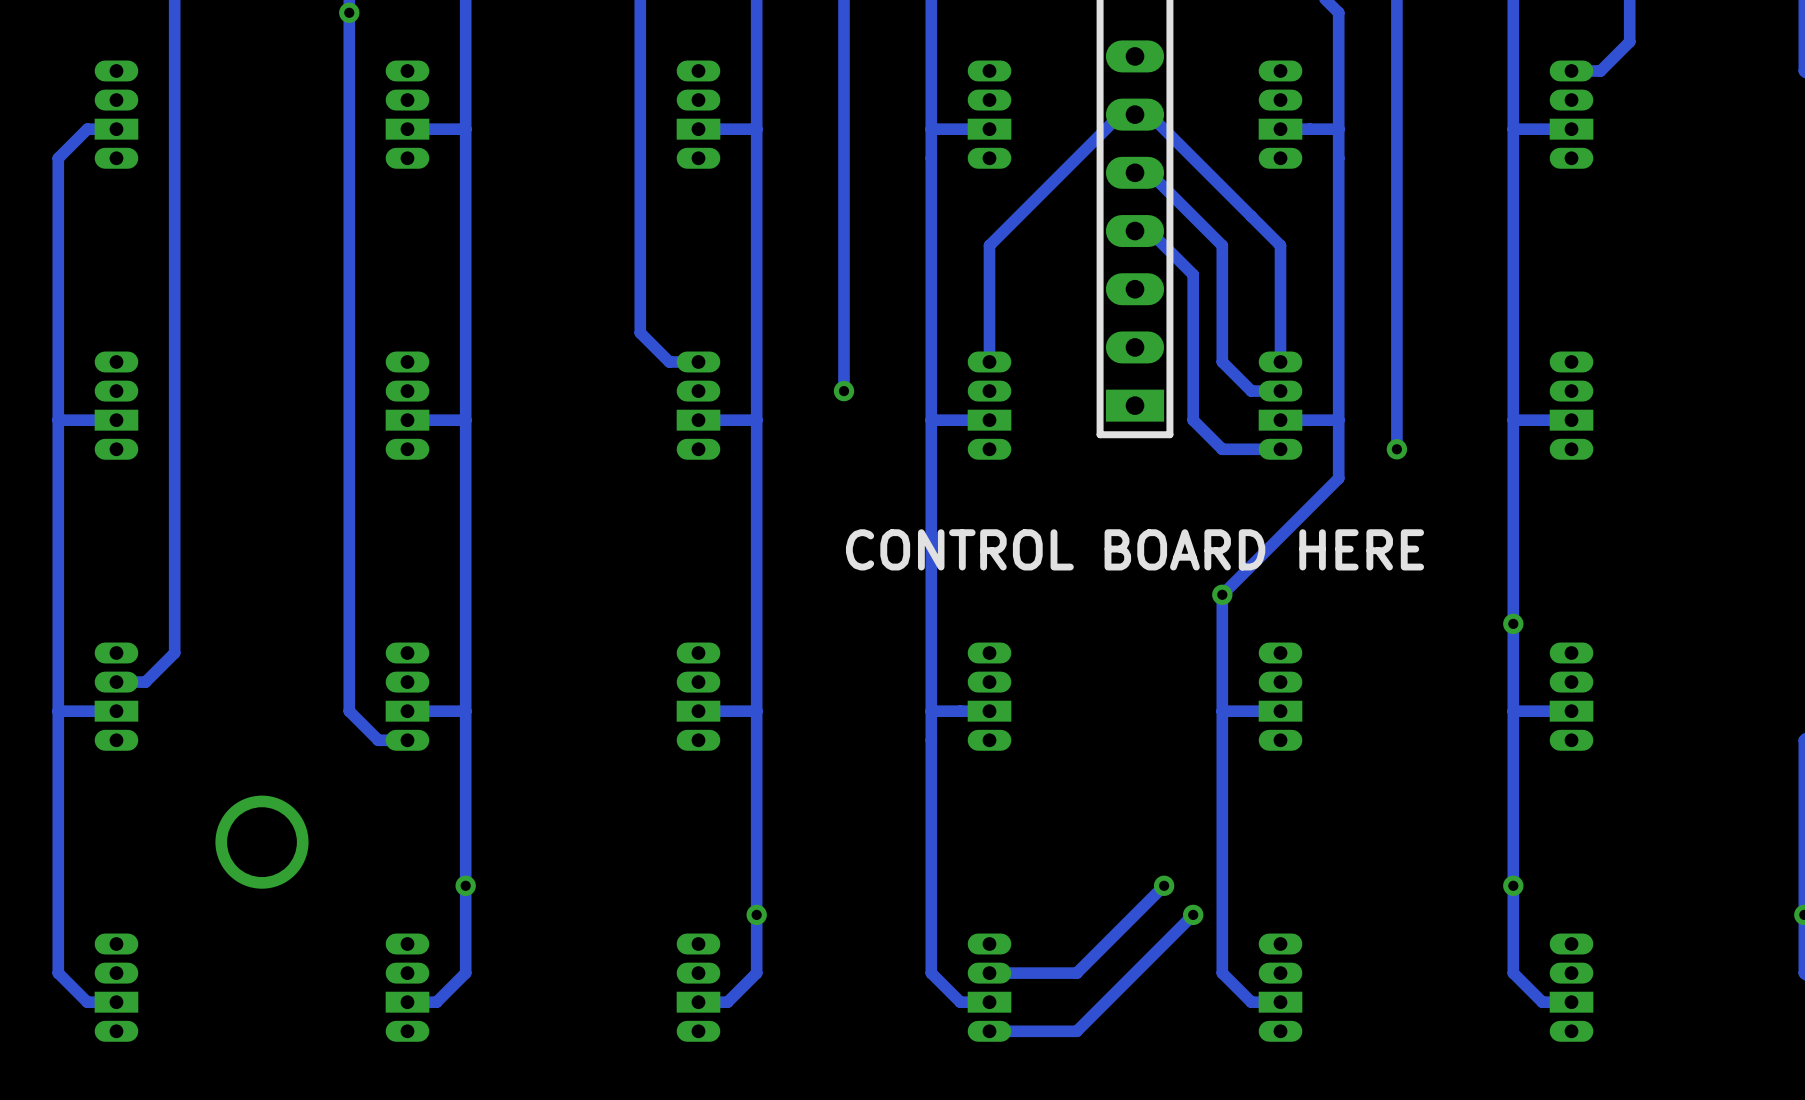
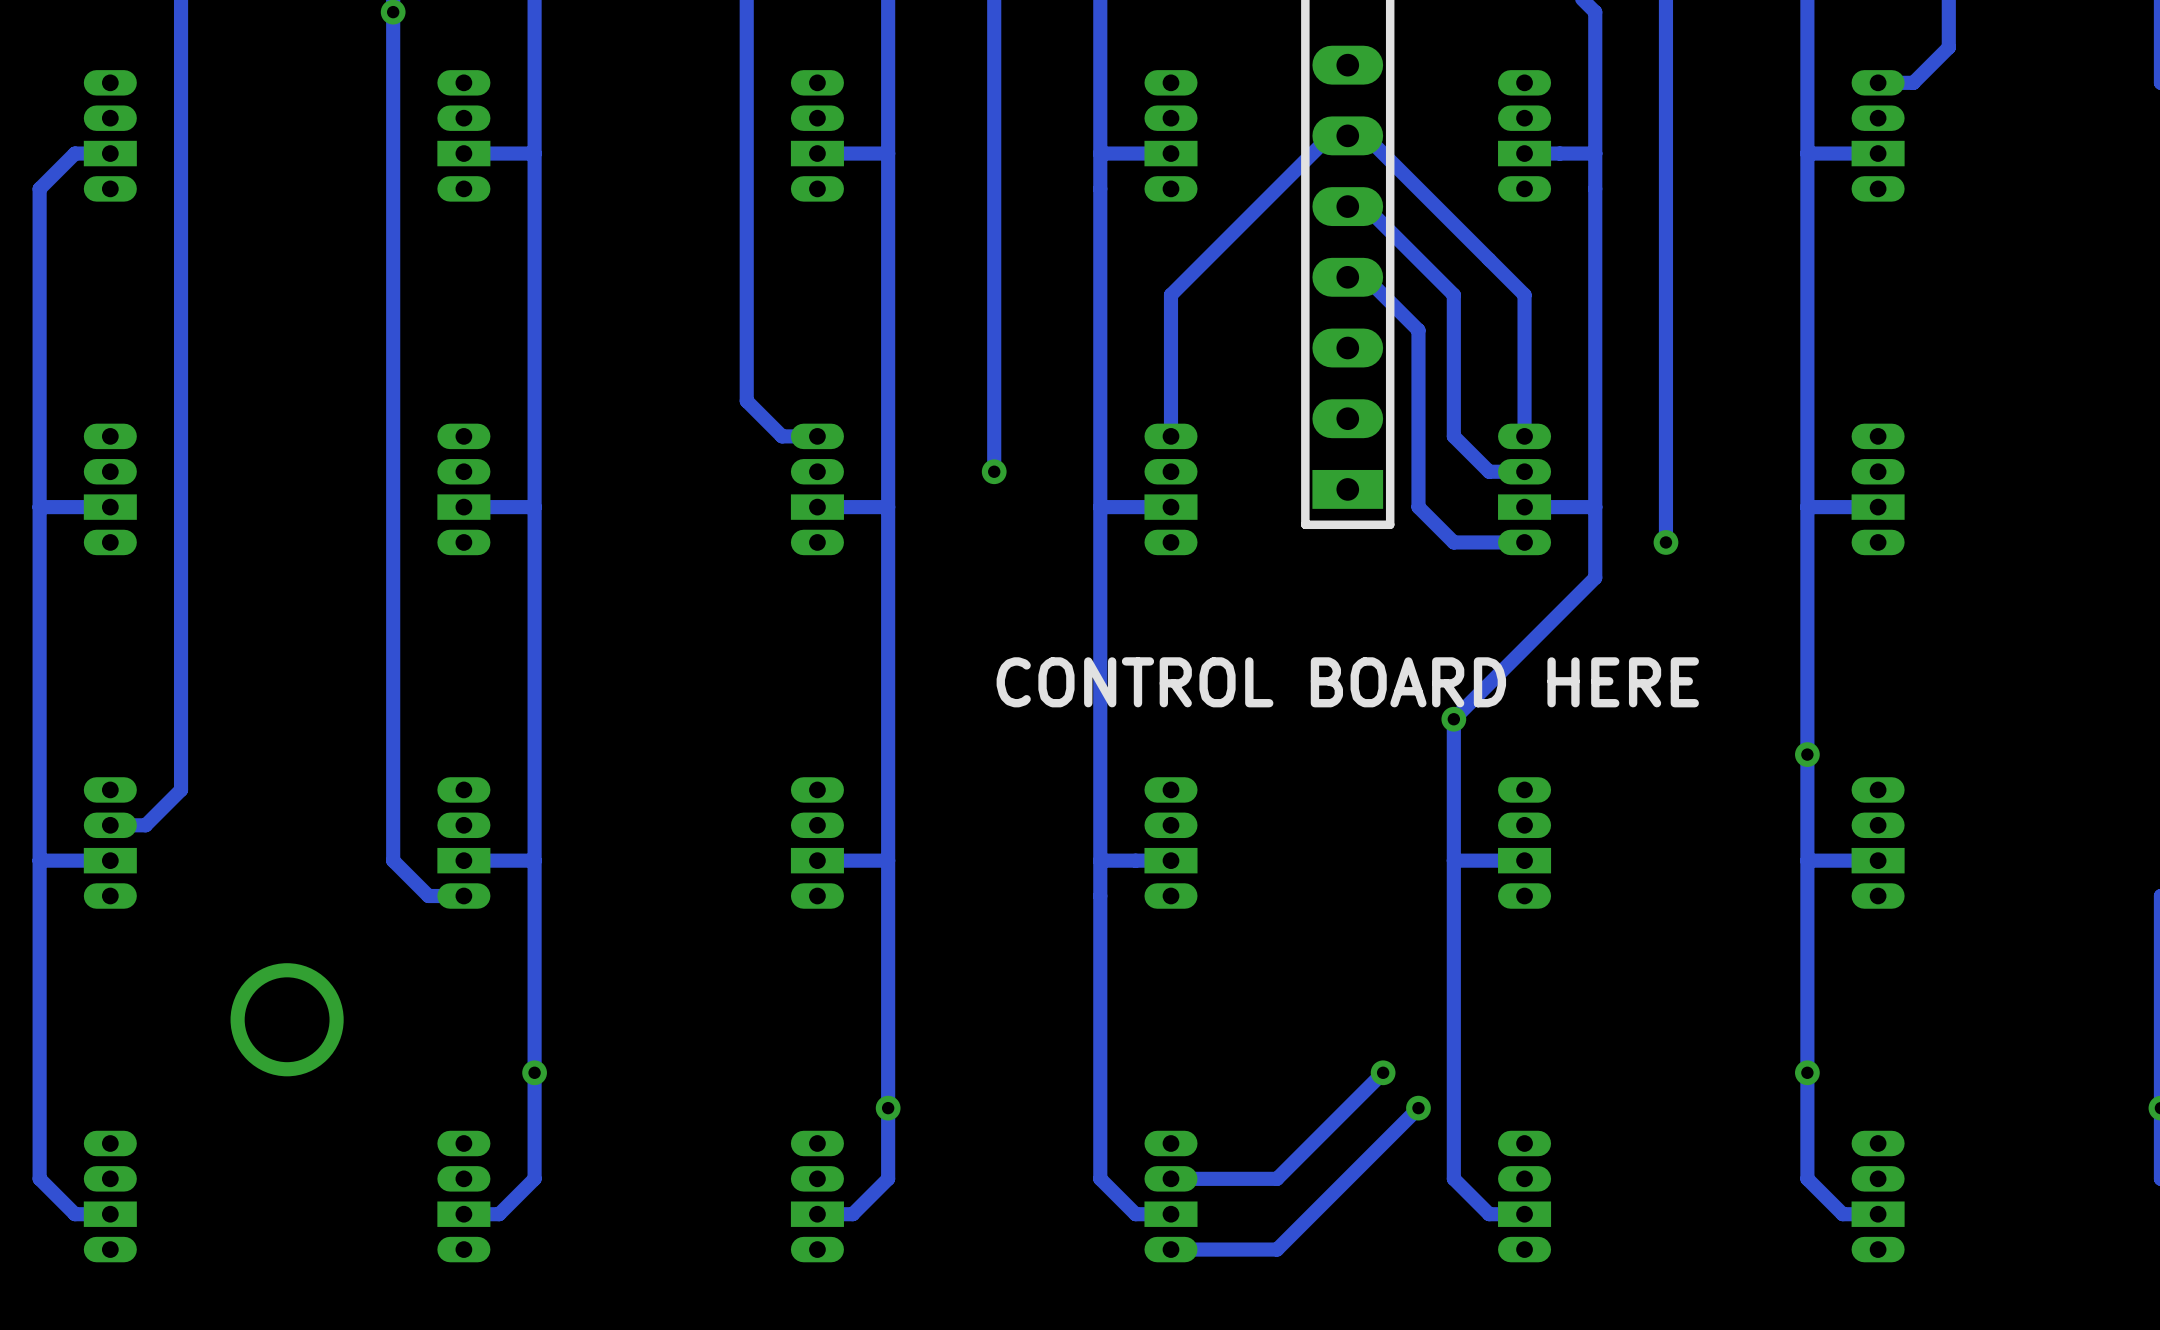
text position: CONTROL BOARD HERE (1135, 549) -> CONTROL BOARD HERE (1347, 682)

